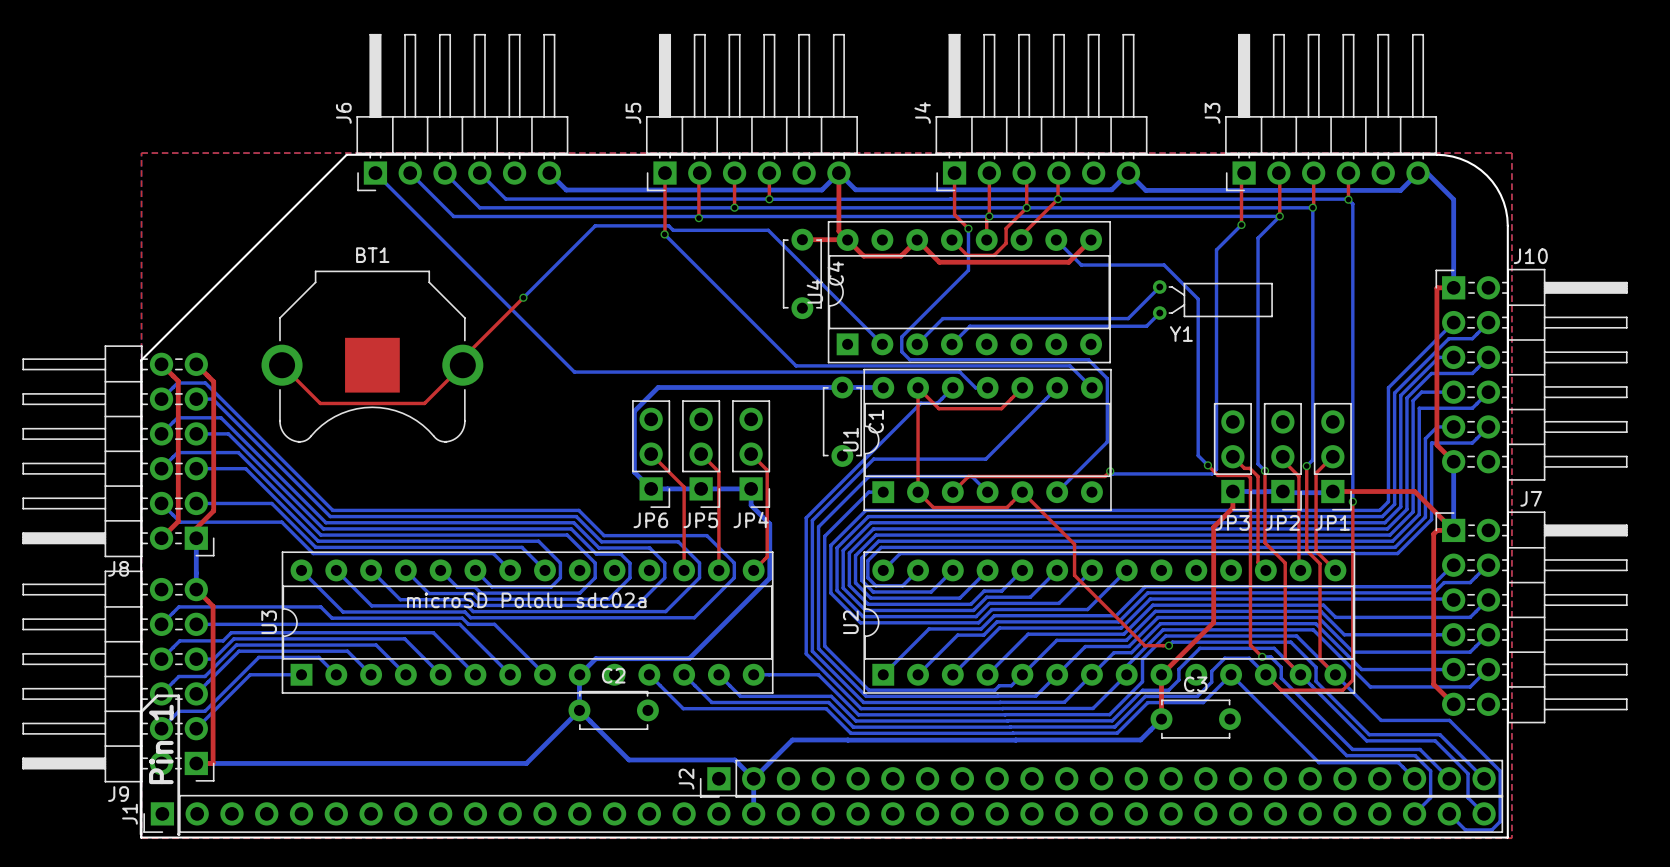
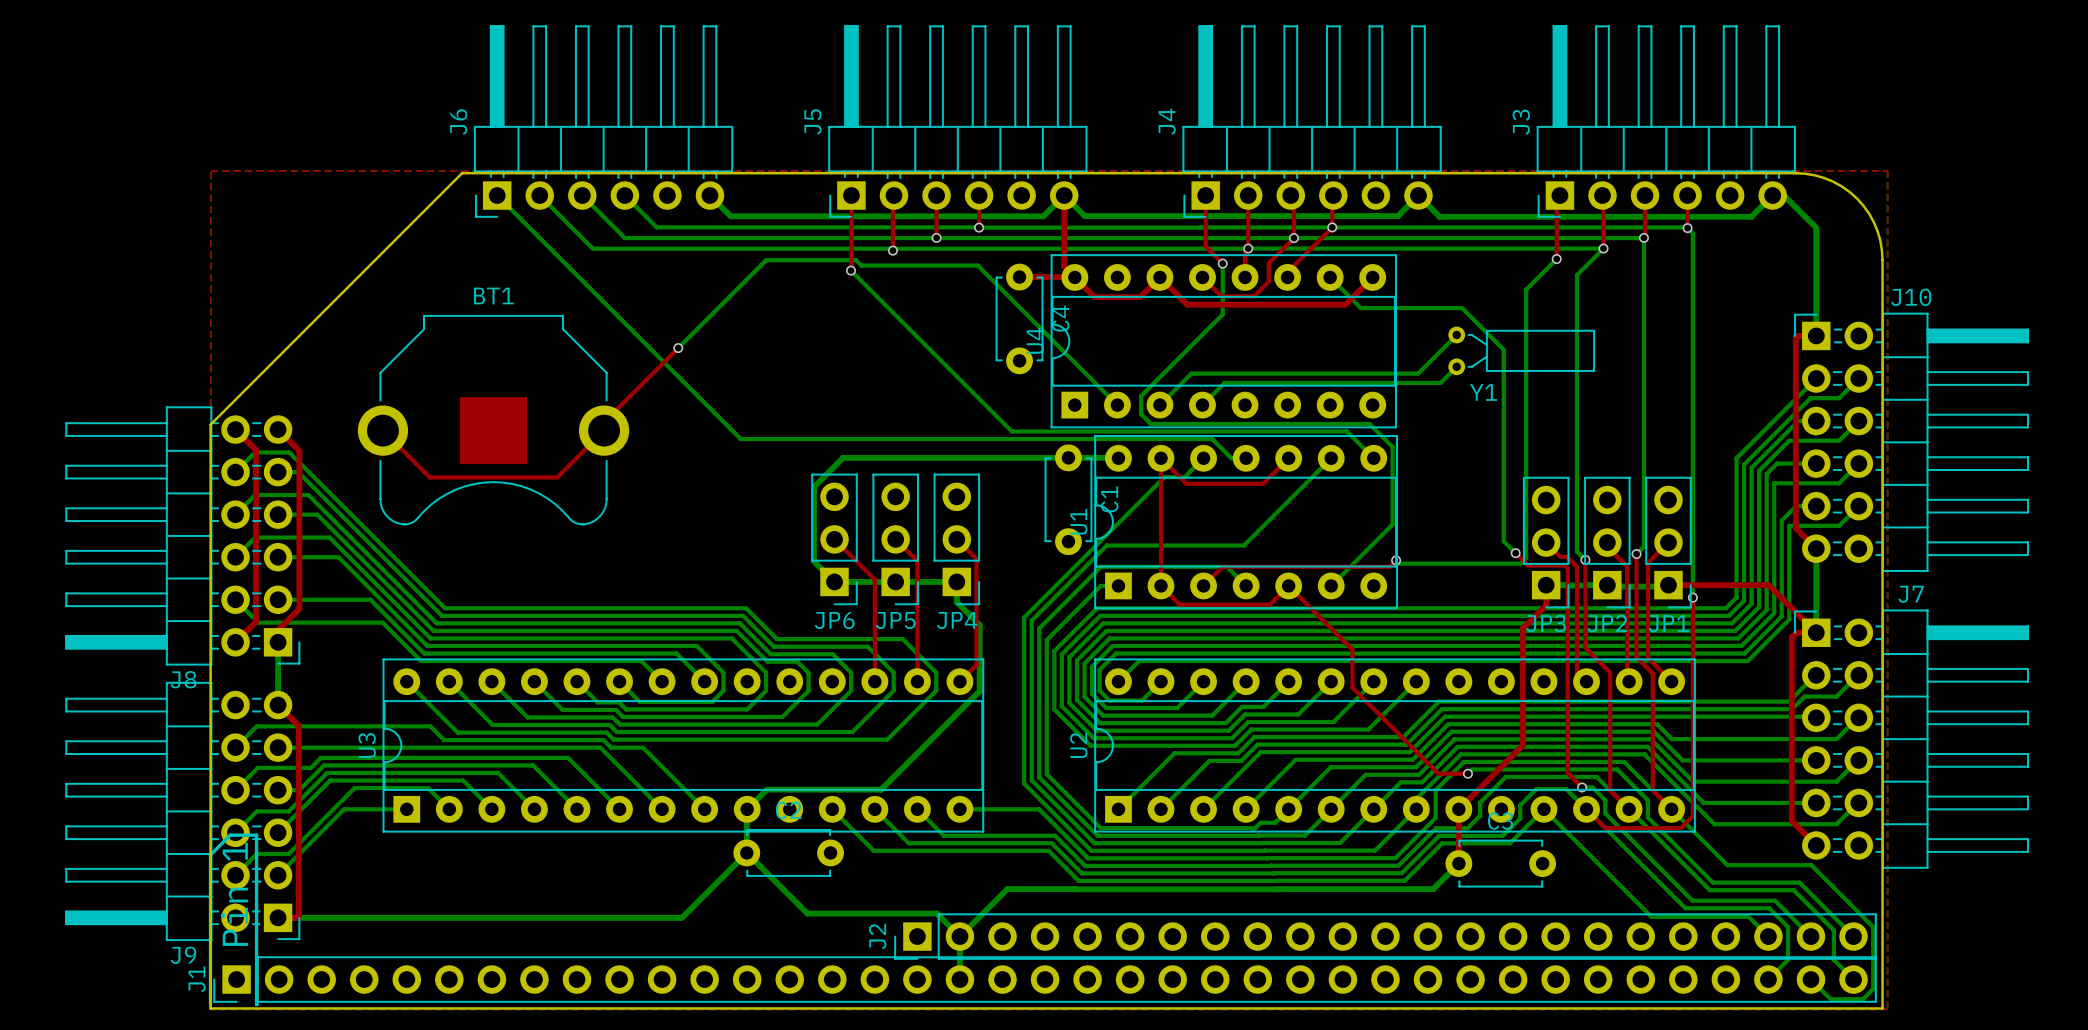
text: microSD Pololu sdc02a (526, 600) -> none

